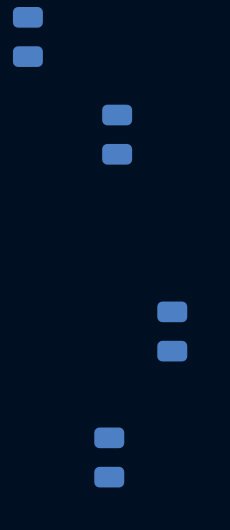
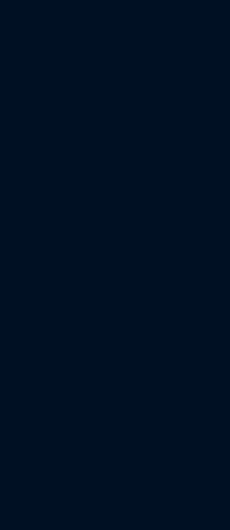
part: (27, 36) -> none
part: (117, 134) -> none
part: (172, 331) -> none
part: (109, 457) -> none

